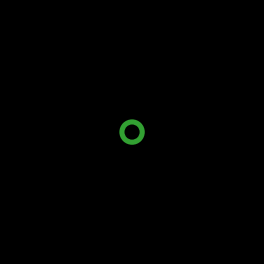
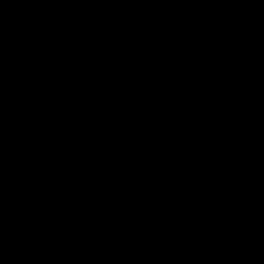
via: (132, 132) -> none

